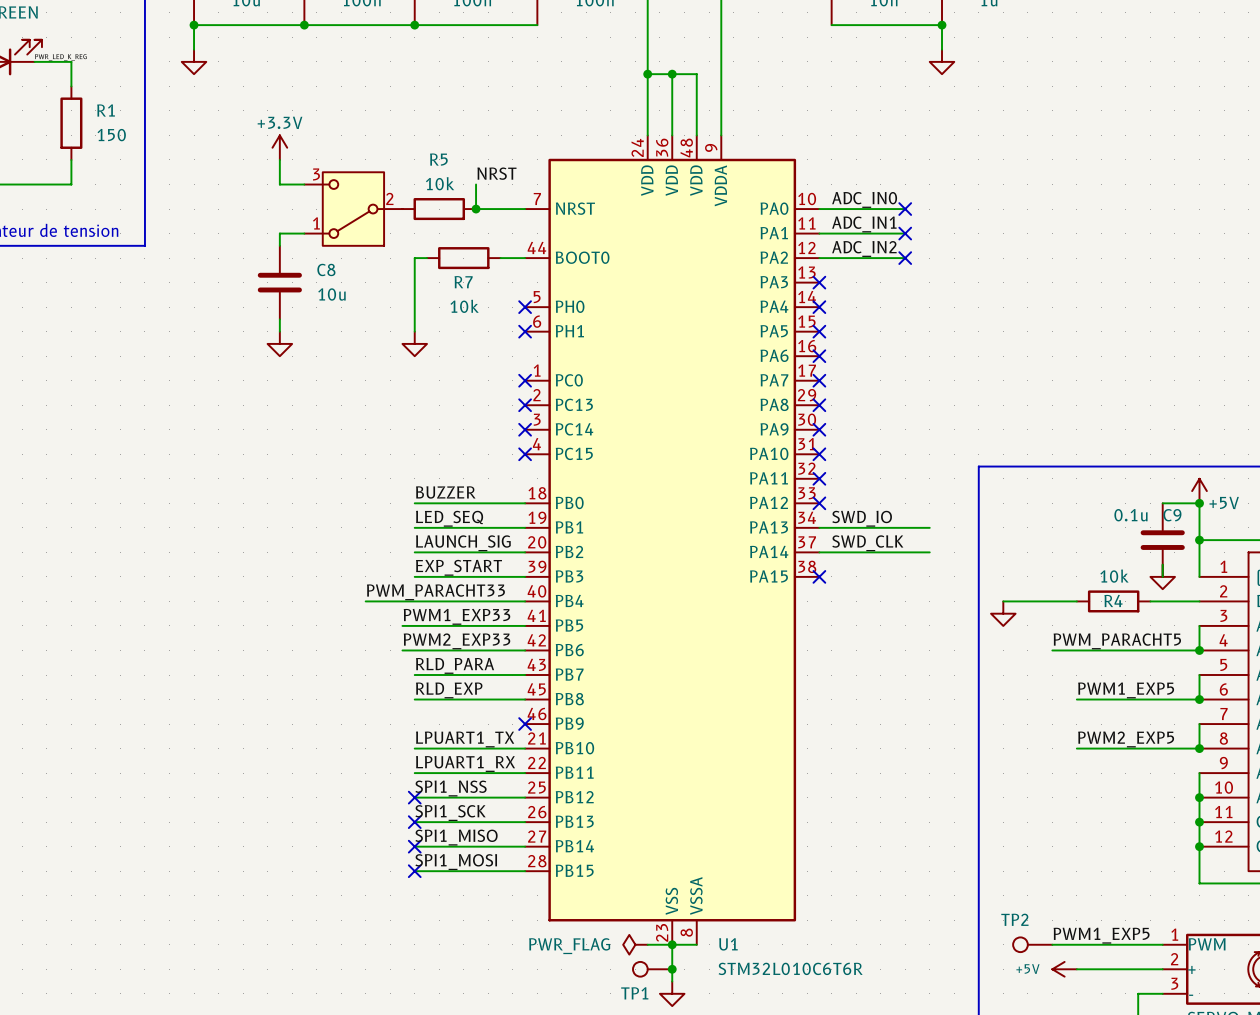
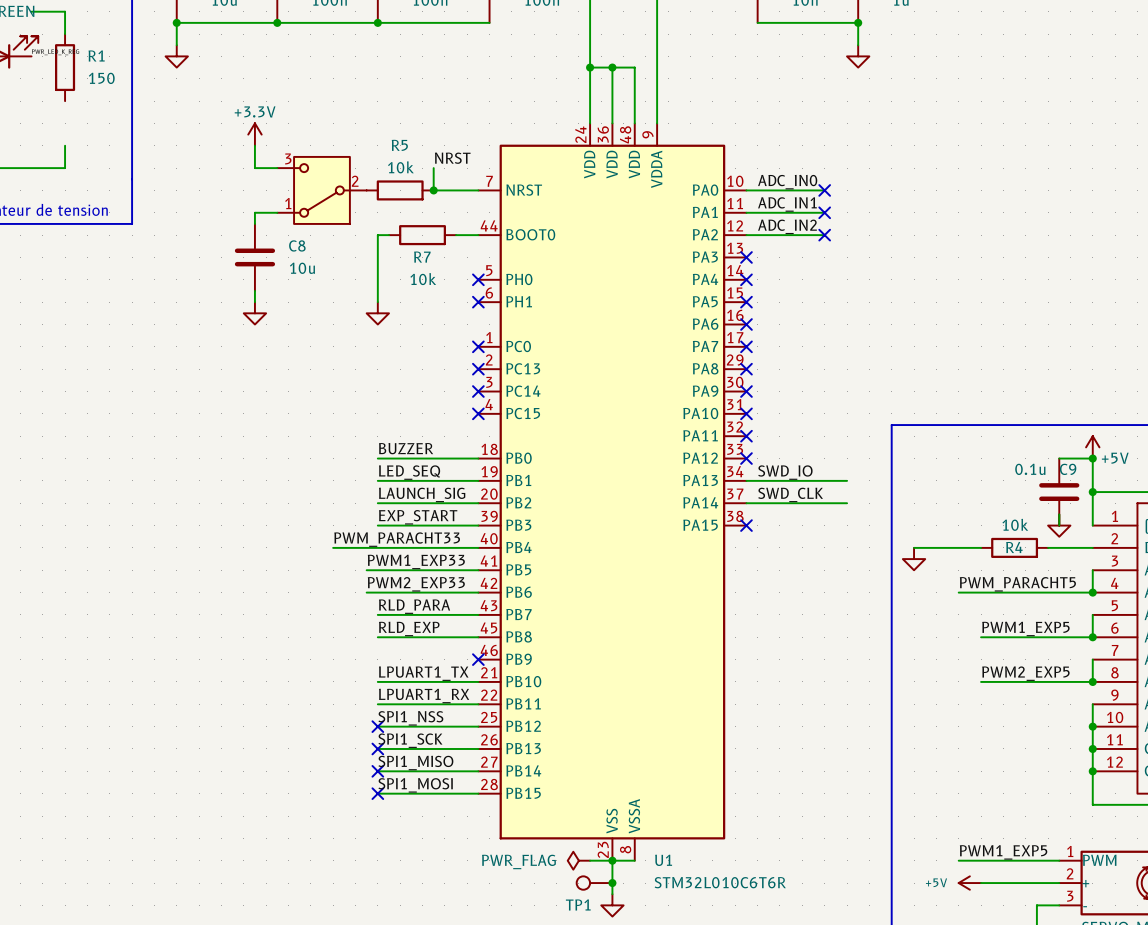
wire: (34, 61) (71, 61) (71, 86) -> (31, 11) (65, 11) (65, 34)
R1 position: (71, 123) -> (65, 67)
TP2: (1032, 944) -> none

